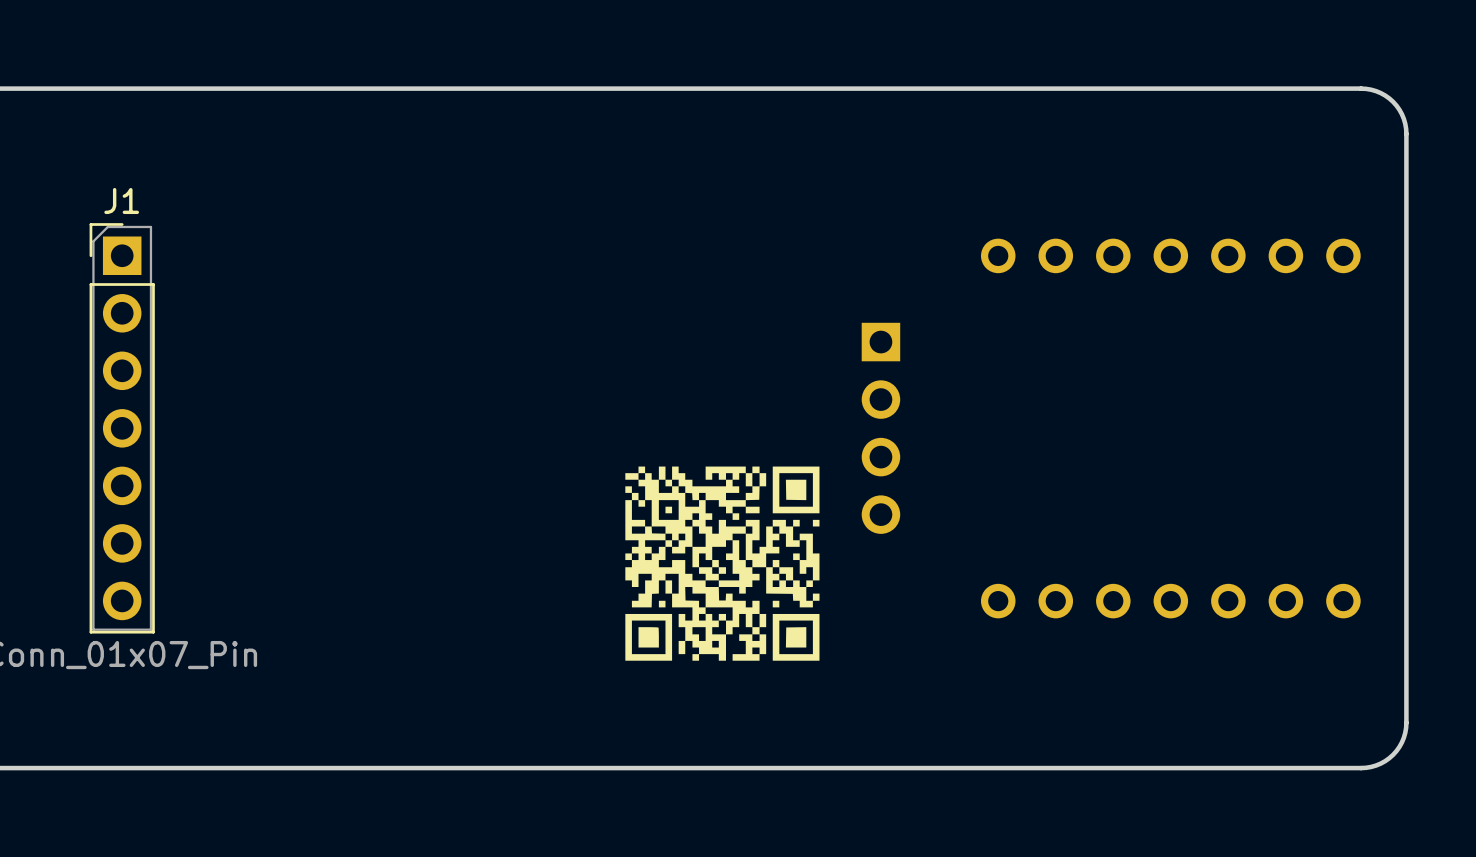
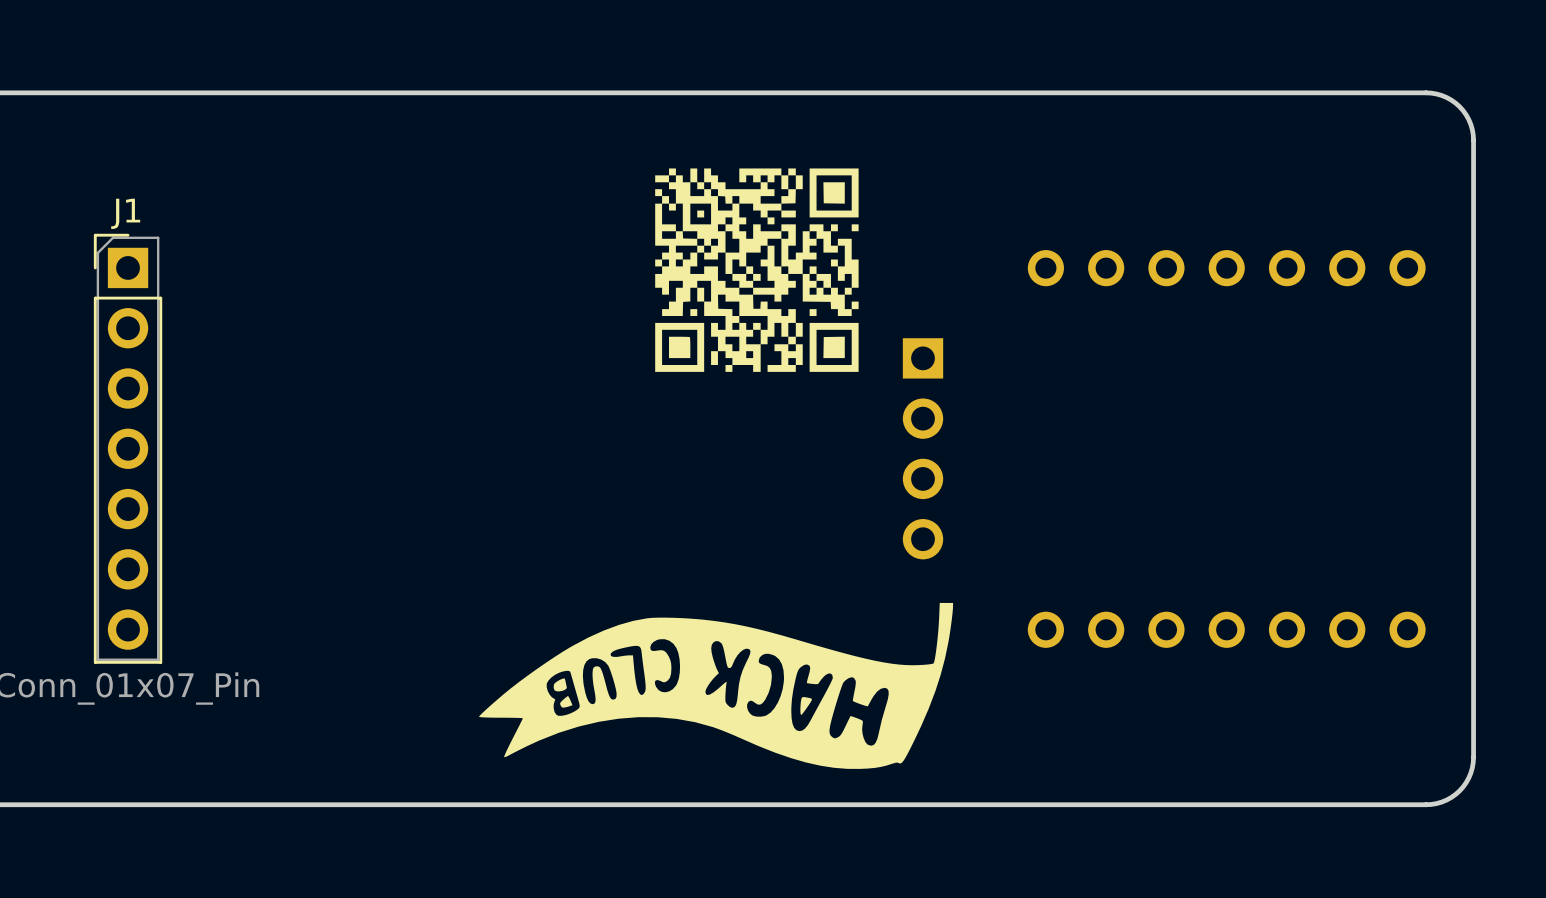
drawing position: (722, 563) -> (756, 270)
drawing: none -> [479, 602, 954, 769]

